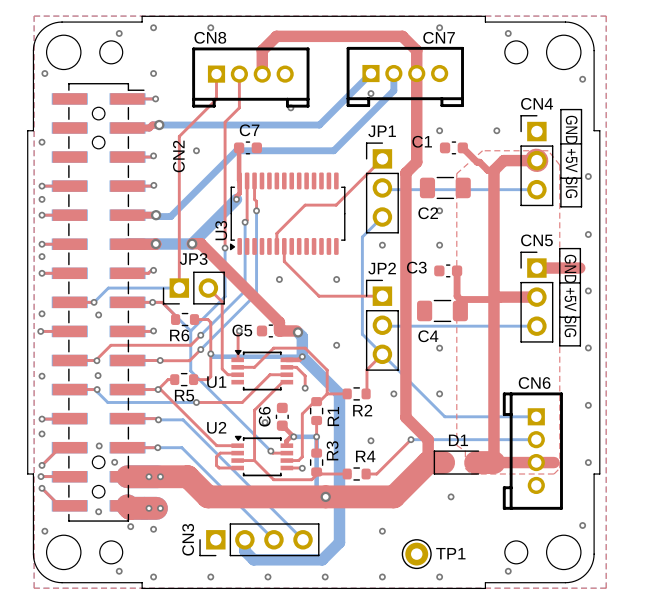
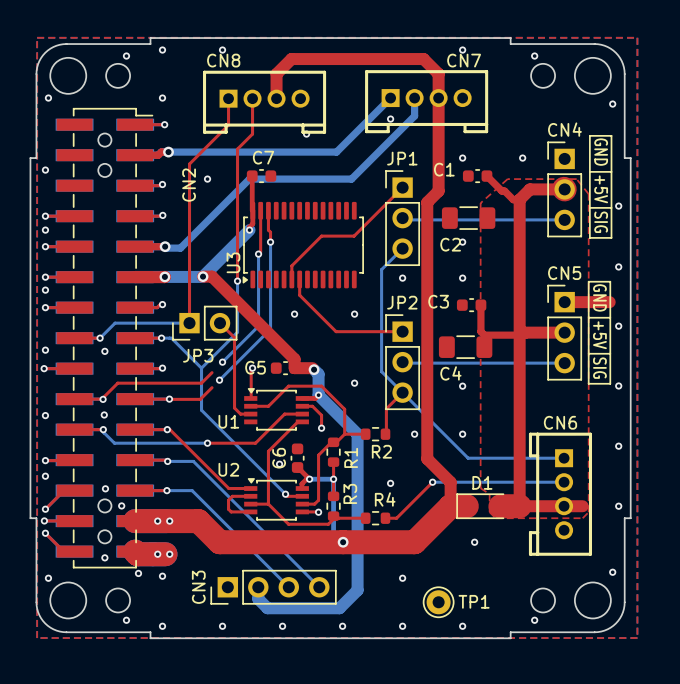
JP3 name position: JP3 (193, 259) -> JP3 (198, 355)
top track: (152, 302) (162, 302) (175, 315) (175, 319) -> none
R6: (185, 319) -> none
top track: (194, 319) (207, 319) (210, 322) (210, 376) (207, 379) (193, 379) -> none
bottom track: (210, 325) (200, 335) -> none
via: none -> (222, 362)
via: (200, 335) -> none
bottom track: (207, 342) (200, 349) -> none
via: none -> (219, 380)
via: (200, 349) -> none
bottom track: (210, 353) (213, 356) (302, 356) -> none
via: (210, 353) -> none
top track: (174, 379) (168, 379) (158, 389) -> none
R5: (184, 379) -> none

